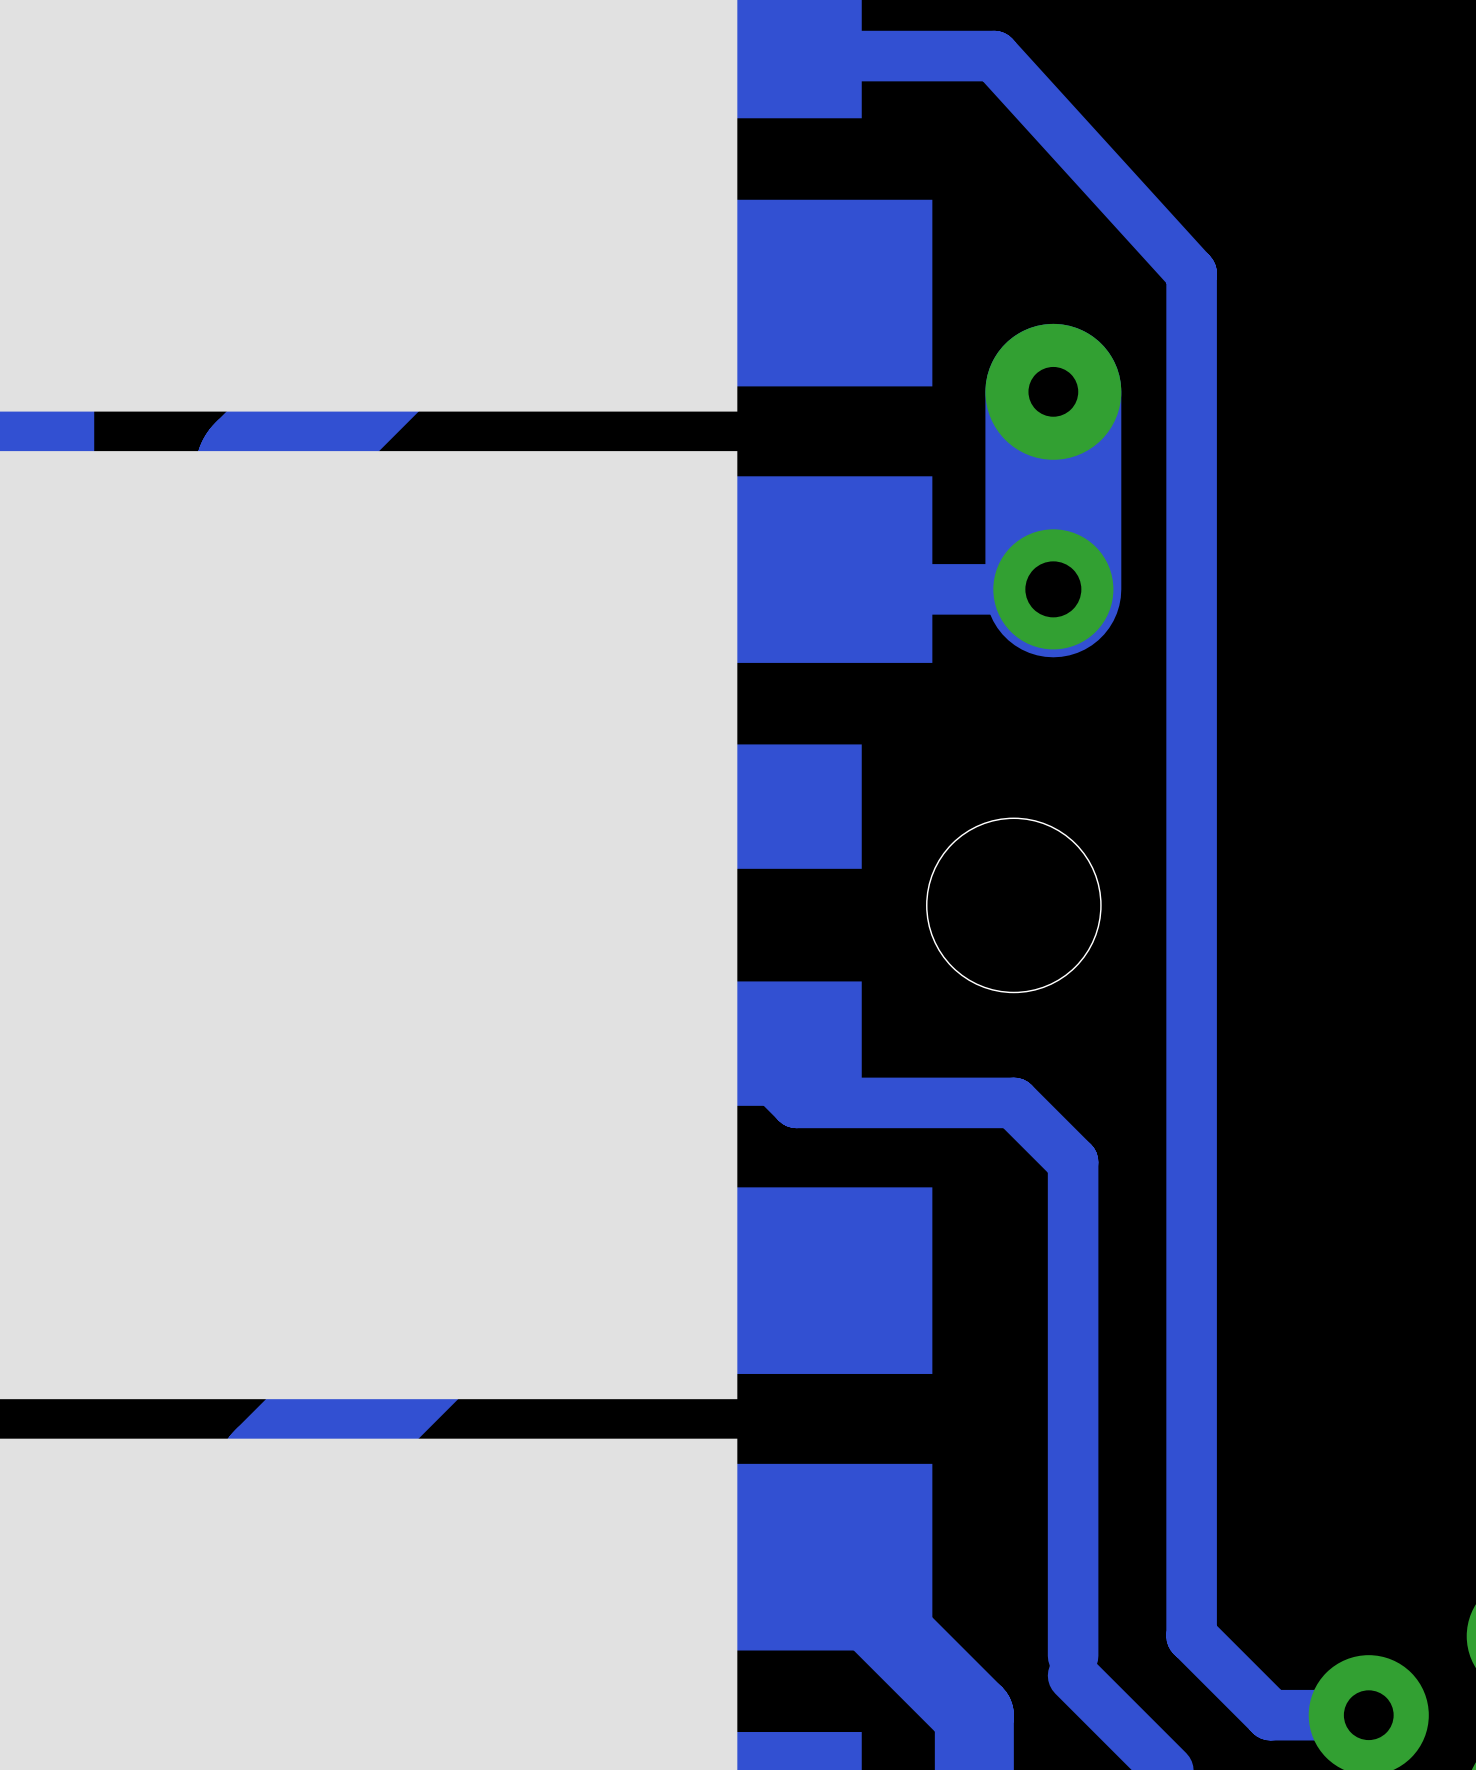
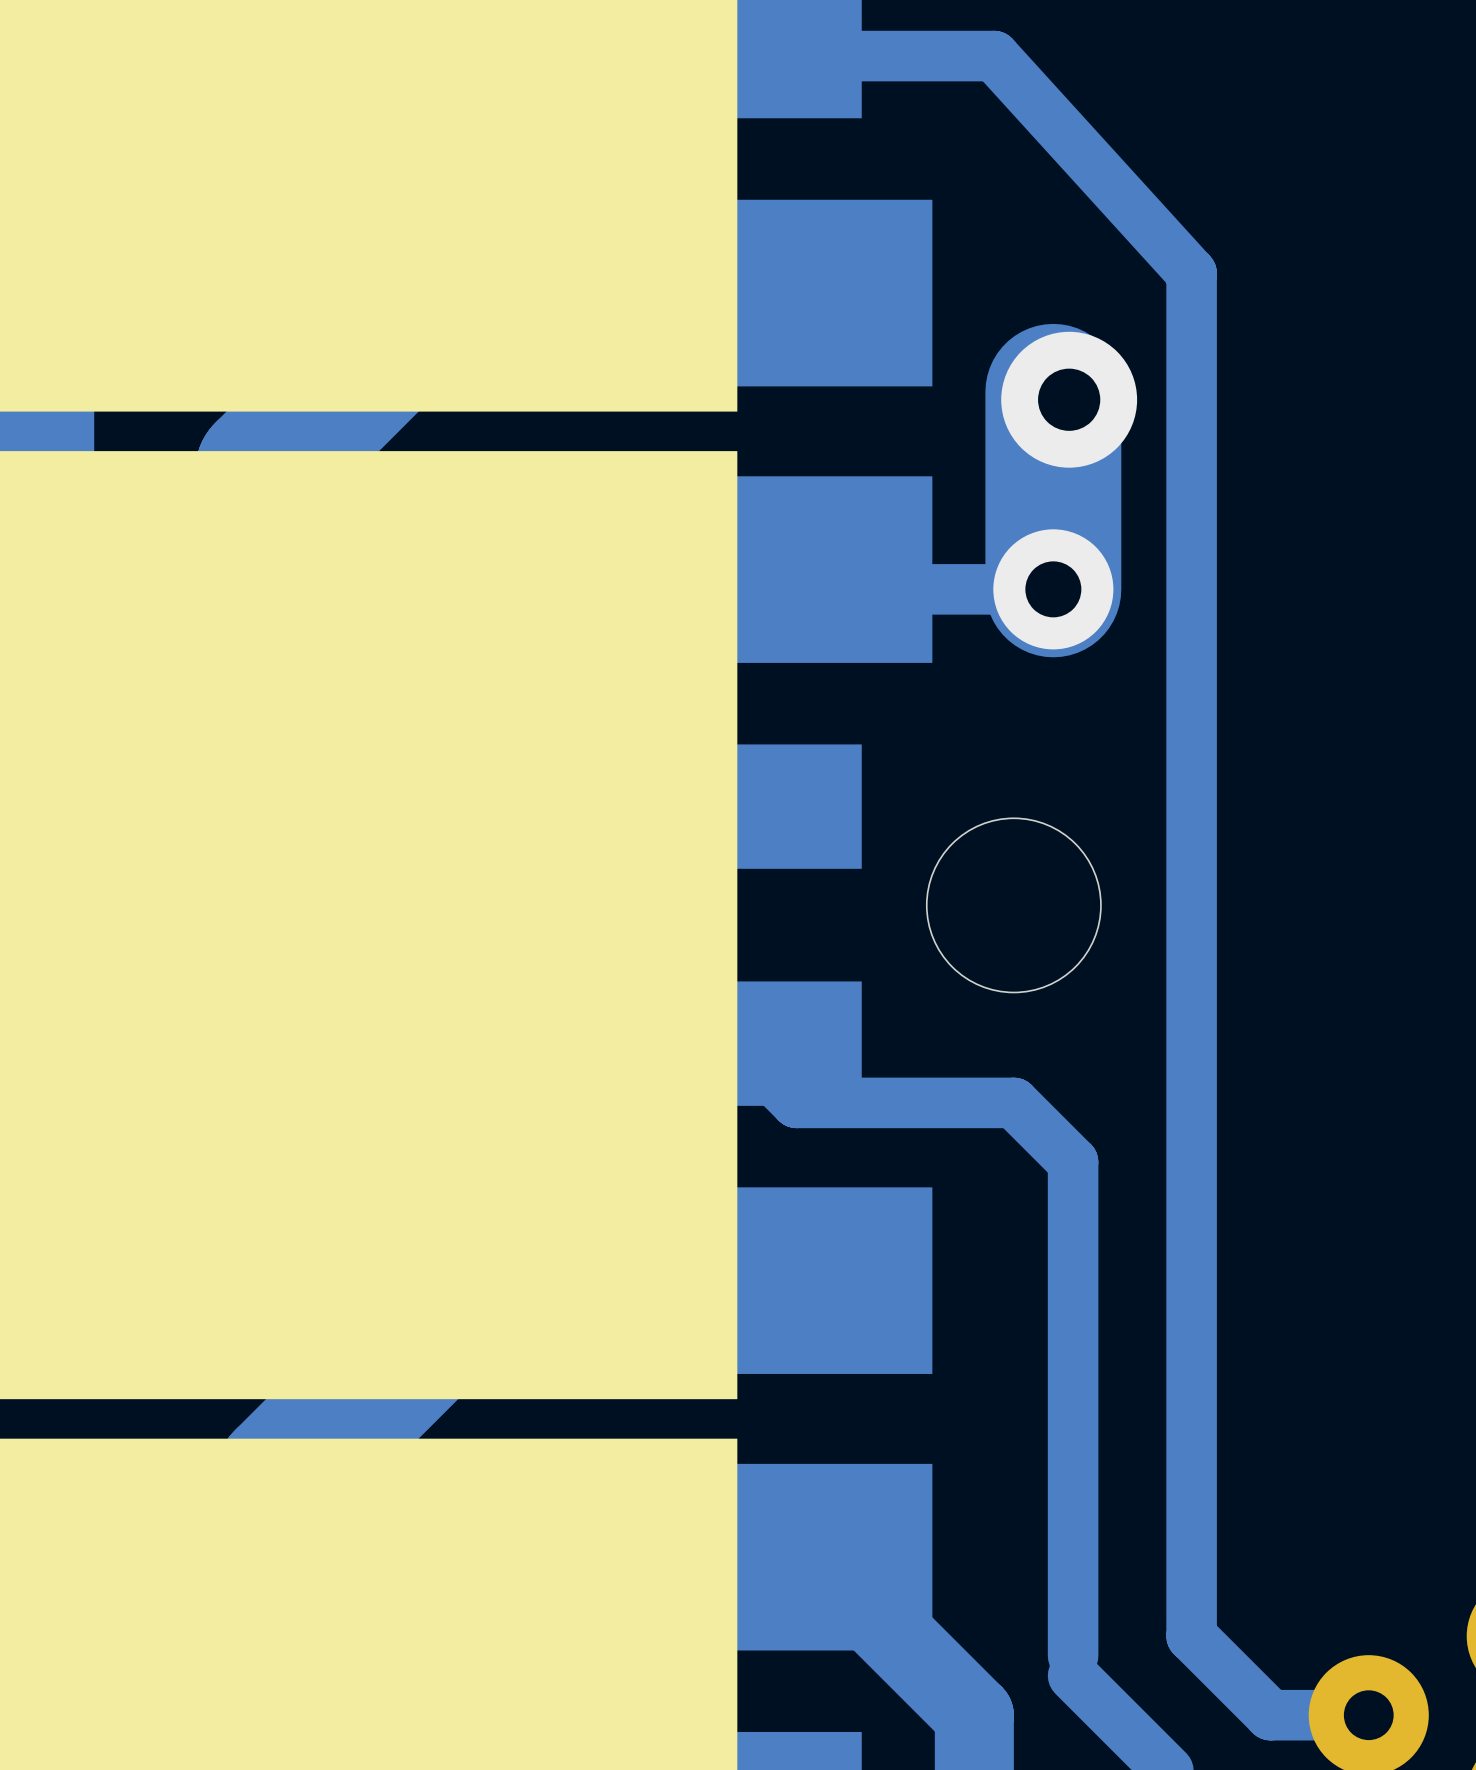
via position: (1053, 391) -> (1069, 399)

